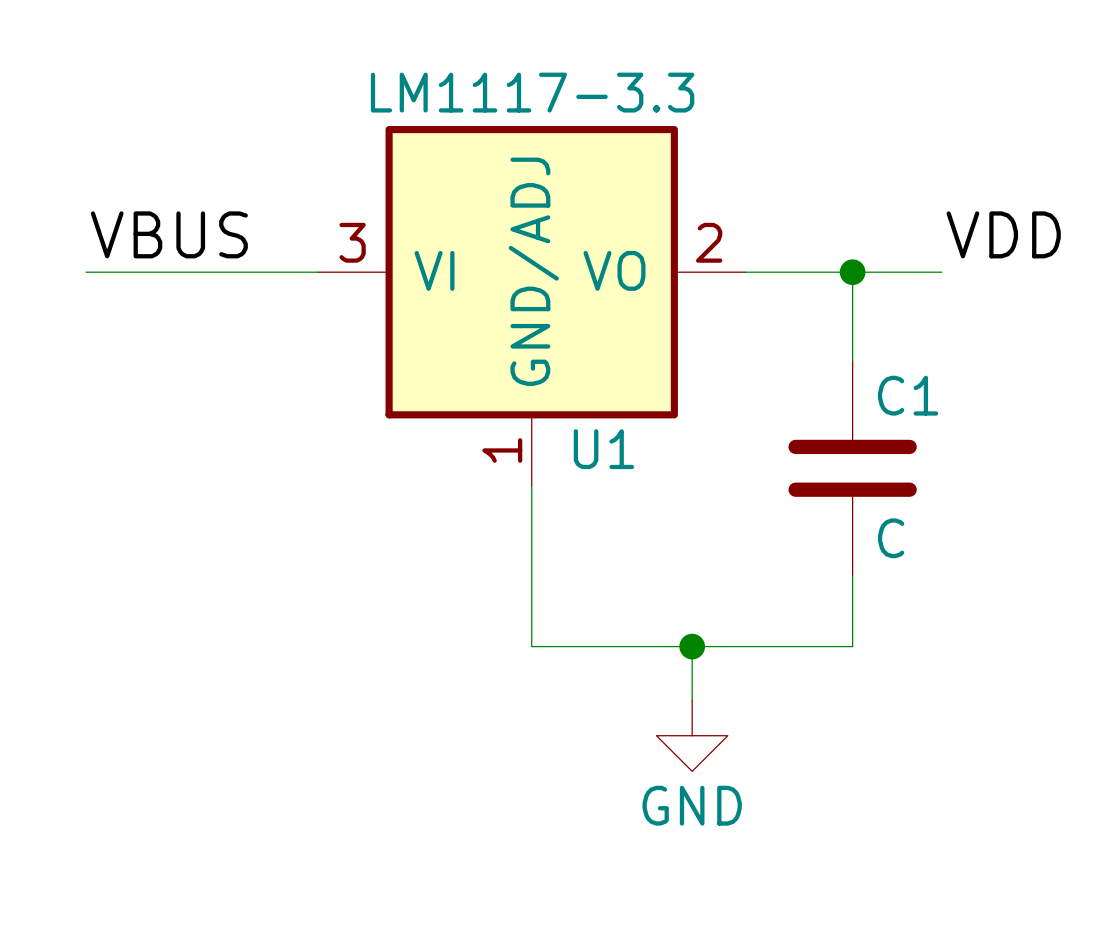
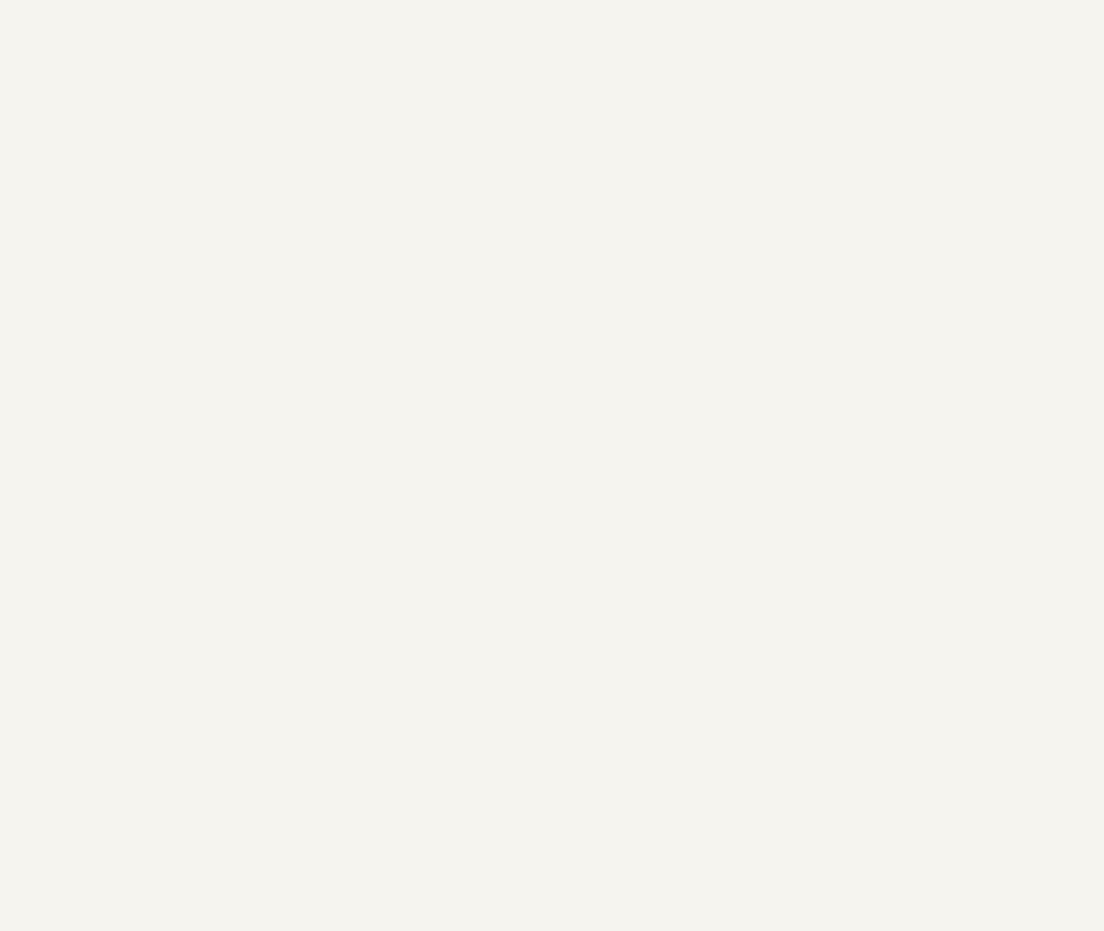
label: VBUS (169, 234) -> none
label: VDD (1003, 234) -> none
wire: (86, 272) (317, 272) -> none
wire: (745, 272) (941, 272) -> none
wire: (852, 272) (852, 361) -> none
junction: (852, 272) -> none
U1: LM1117-3.3 (531, 306) -> none
C1: C (852, 468) -> none
wire: (531, 486) (531, 646) (852, 646) (852, 575) -> none
wire: (692, 646) (692, 700) -> none
junction: (692, 646) -> none
power symbol: GND (692, 735) -> none

